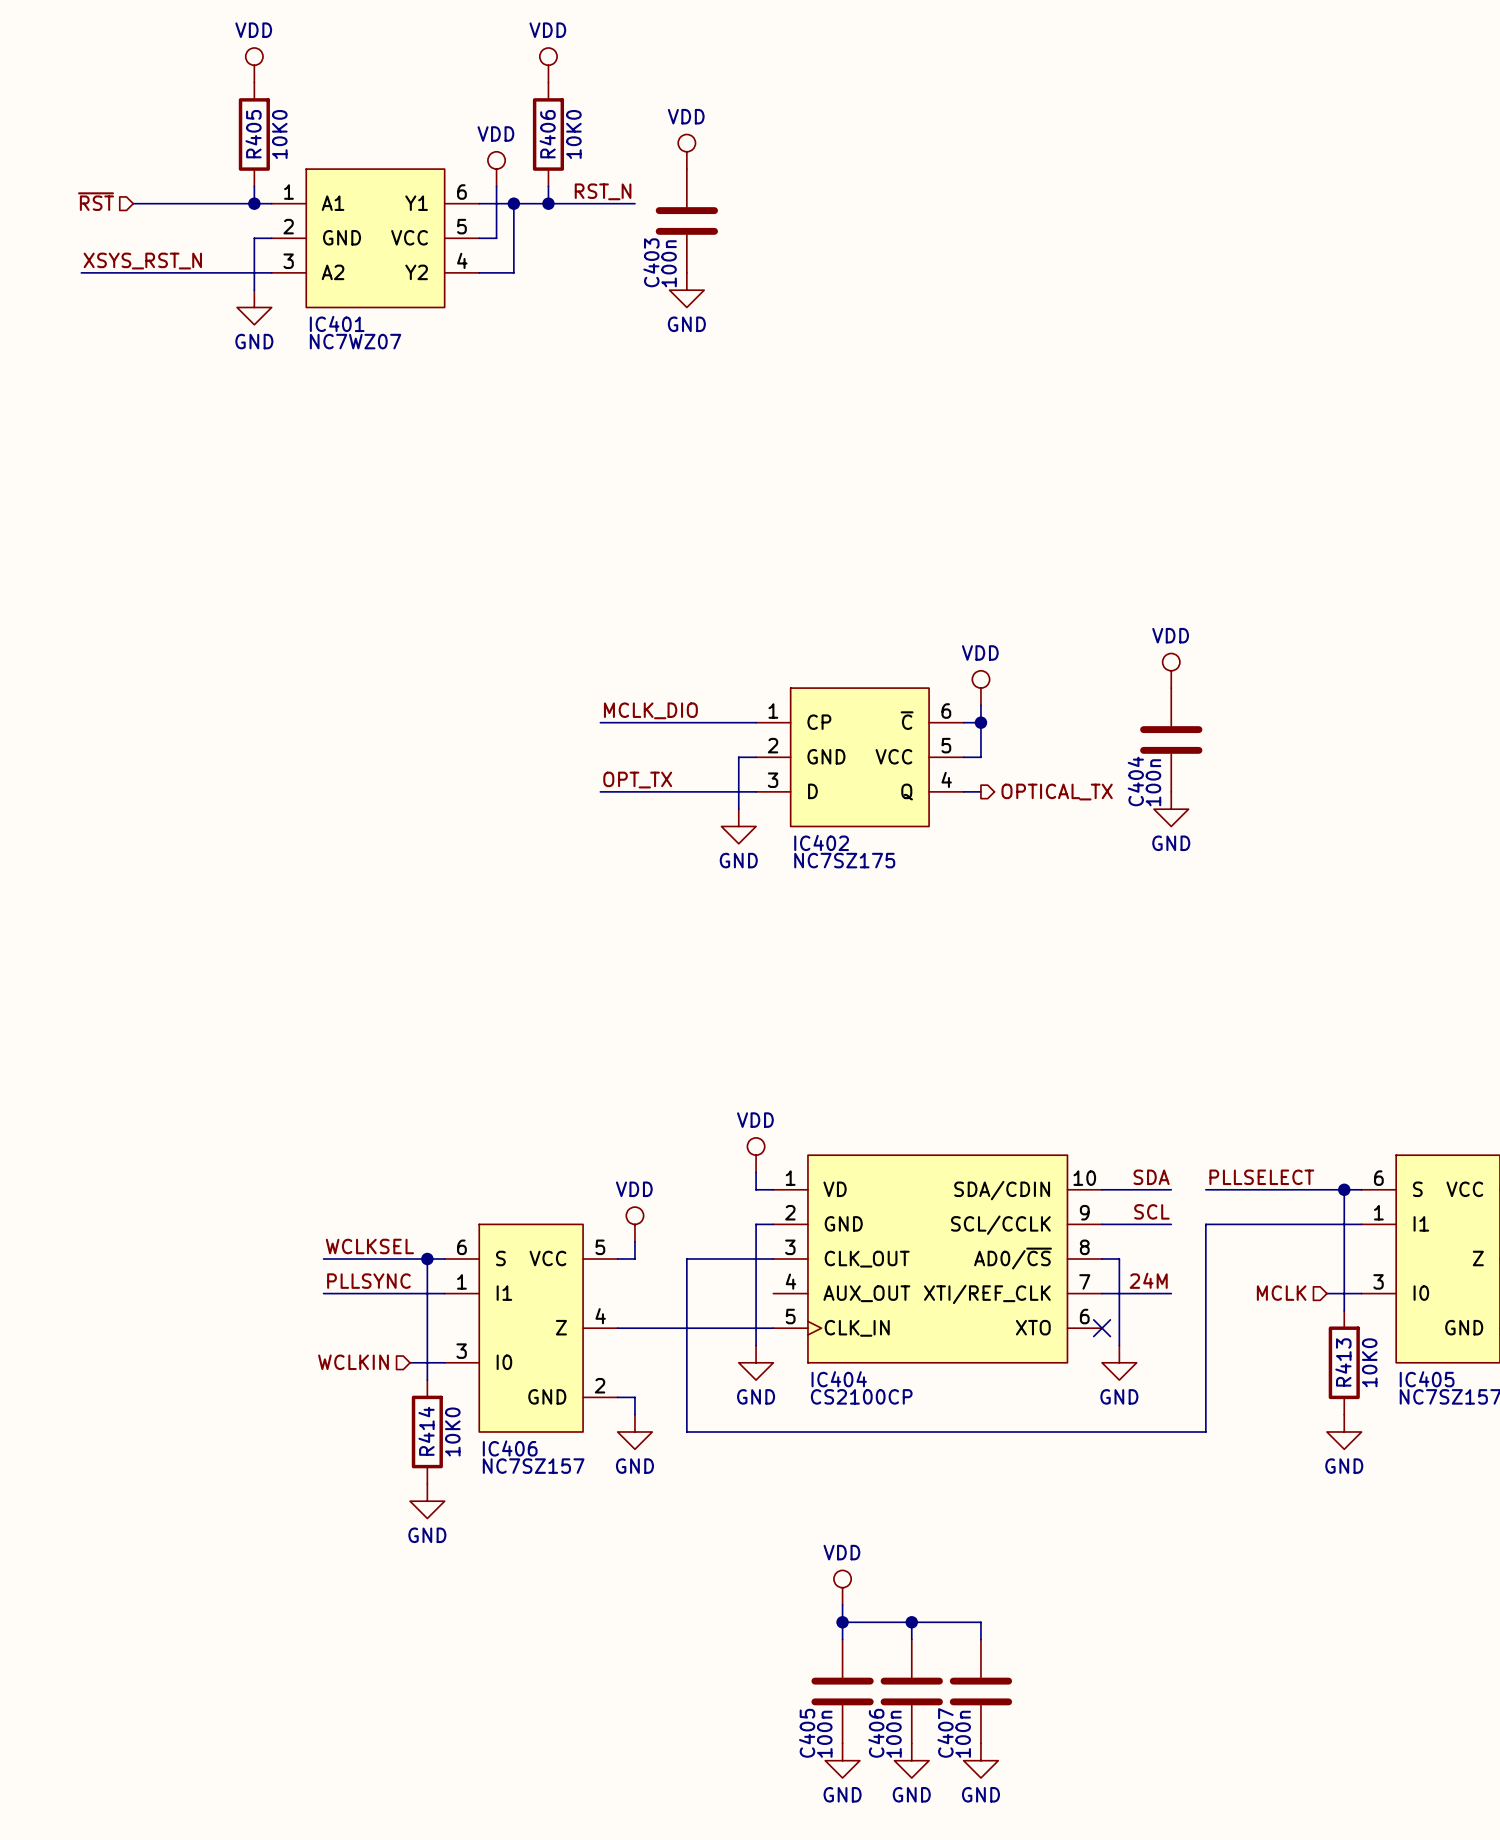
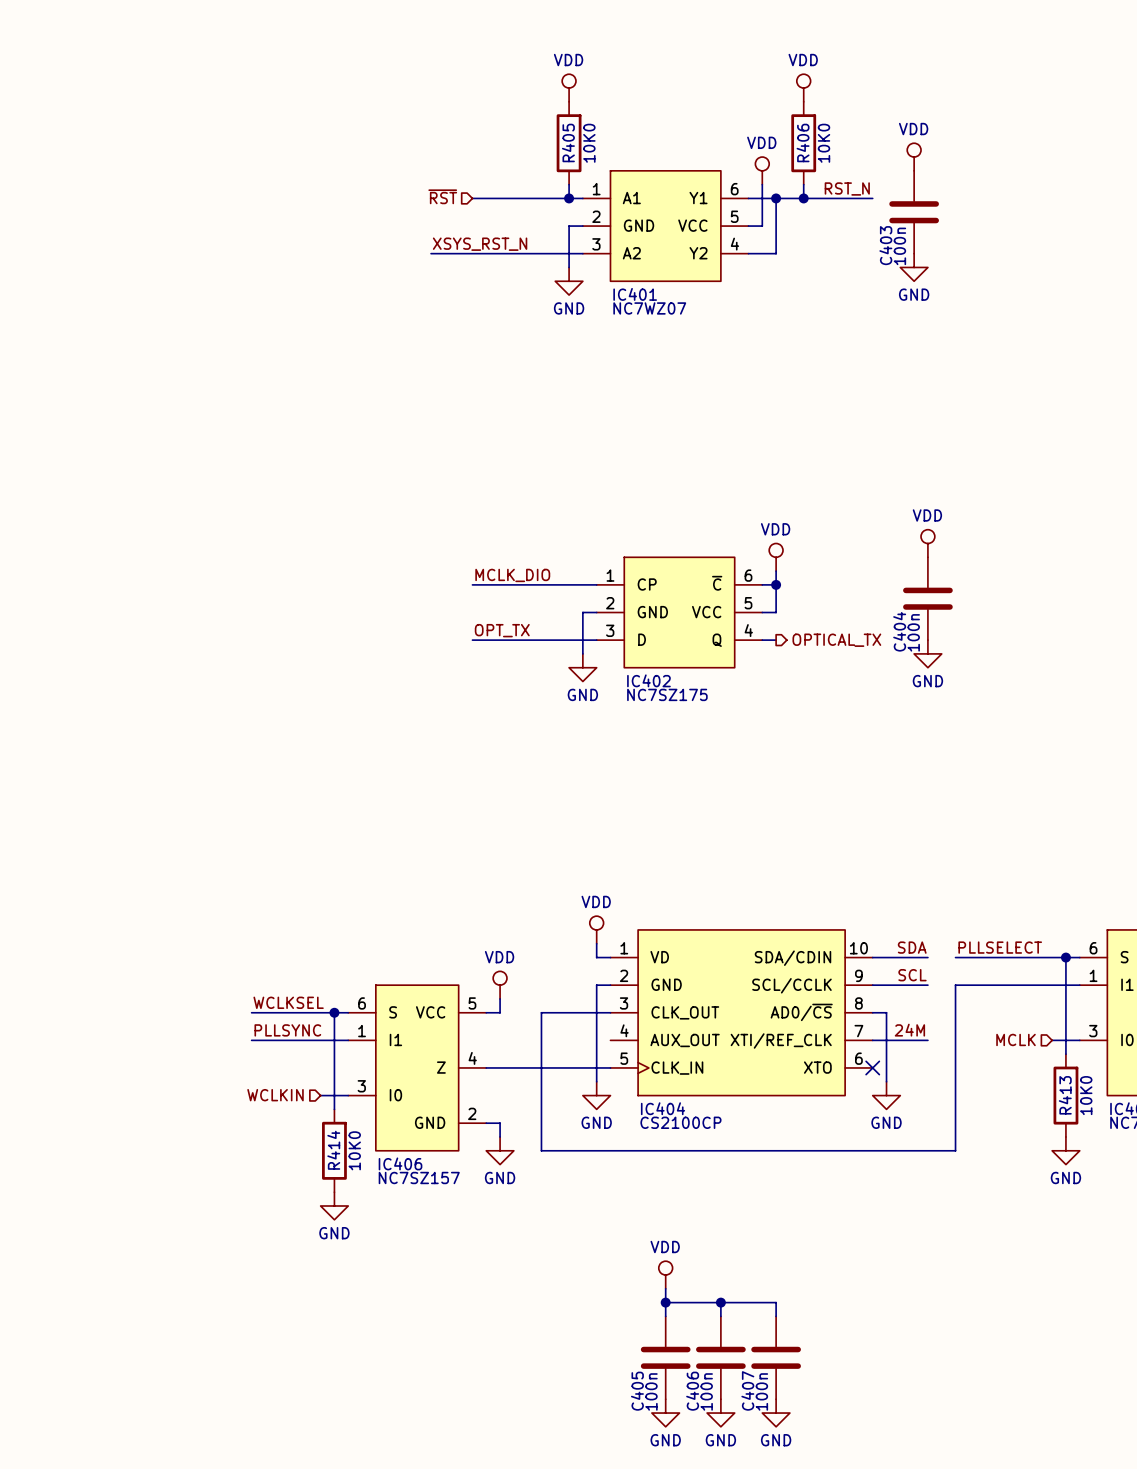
power symbol: VDD (254, 65) -> none
power symbol: VDD (548, 65) -> none
power symbol: none -> VDD (803, 88)
R405 position: (254, 134) -> (569, 143)
R406 position: (548, 134) -> (803, 143)
power symbol position: VDD (686, 151) -> VDD (569, 88)
power symbol: VDD (496, 169) -> none
wire: (254, 186) (254, 203) -> none
wire: (496, 186) (496, 238) (479, 238) -> none
wire: (548, 186) (548, 203) -> (569, 184) (569, 198)
power symbol: none -> VDD (914, 157)
label: RST_N (603, 191) -> none
hierarchical label: ~{RST} (96, 201) -> none
wire: (133, 203) (271, 203) -> none
junction: (254, 203) -> none
wire: (479, 203) (634, 203) -> none
wire: (513, 203) (513, 272) (479, 272) -> none
junction: (513, 203) -> none
junction: (548, 203) -> none
power symbol: none -> VDD (762, 170)
C403 position: (686, 220) -> (914, 212)
wire: none -> (762, 184) (762, 226) (748, 226)
wire: none -> (803, 184) (803, 198)
label: none -> RST_N (847, 188)
hierarchical label: none -> ~{RST} (442, 196)
wire: (271, 238) (254, 238) (254, 290) -> none
IC401 position: (375, 238) -> (665, 226)
wire: none -> (472, 198) (582, 198)
junction: none -> (569, 198)
wire: none -> (748, 198) (872, 198)
wire: none -> (776, 198) (776, 253) (748, 253)
junction: none -> (776, 198)
junction: none -> (803, 198)
label: XSYS_RST_N (142, 261) -> none
wire: (81, 272) (271, 272) -> none
wire: none -> (582, 226) (569, 226) (569, 267)
power symbol position: GND (686, 290) -> GND (569, 281)
label: none -> XSYS_RST_N (480, 244)
power symbol: GND (254, 307) -> none
wire: none -> (431, 253) (582, 253)
power symbol: none -> GND (914, 267)

